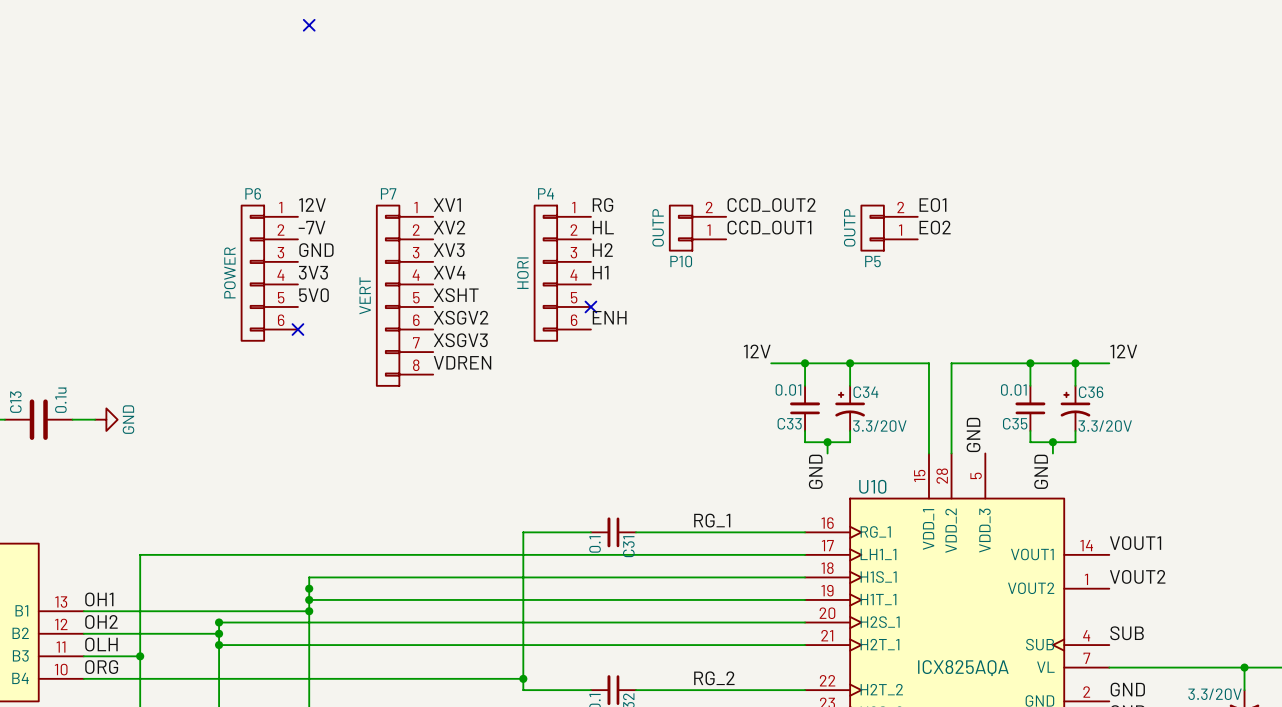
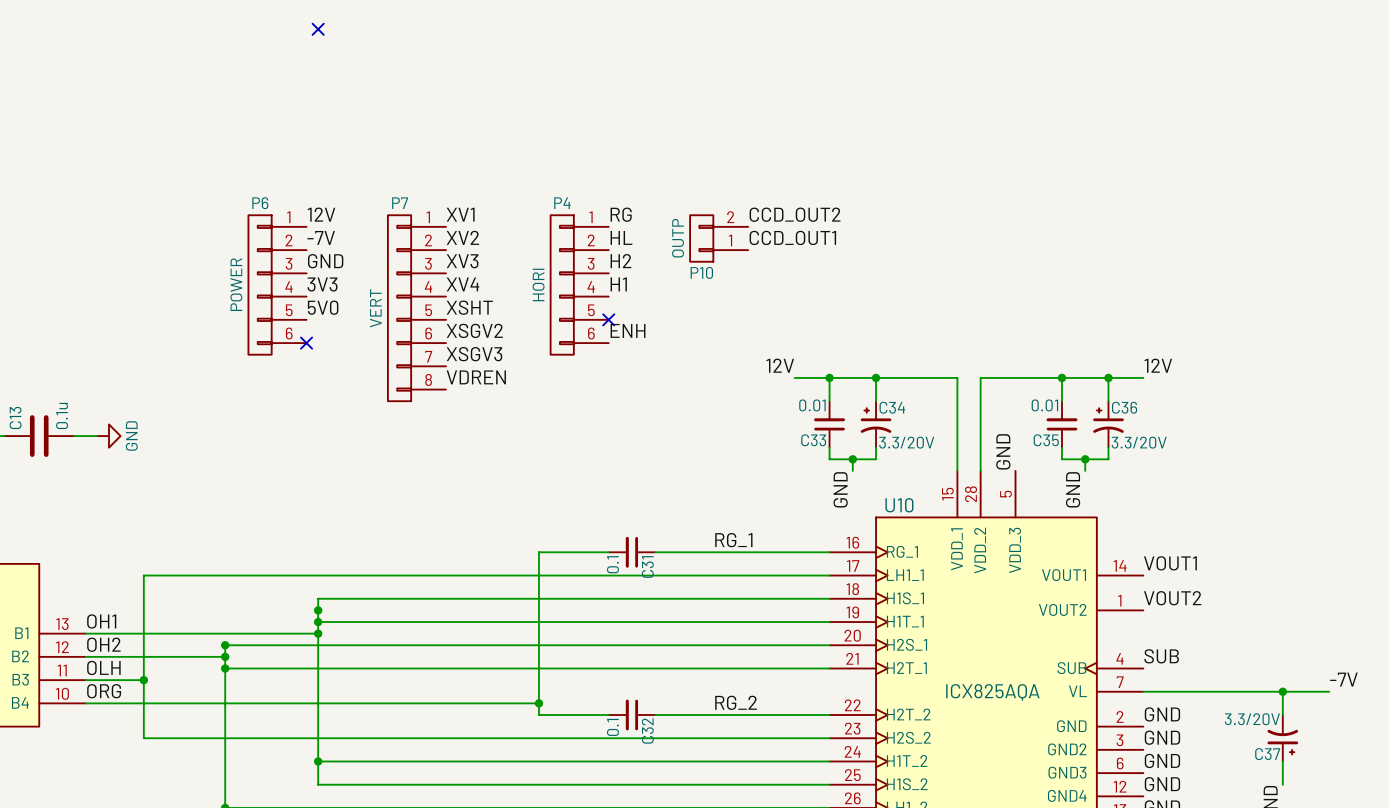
label: EO1 (932, 205) -> none
label: EO2 (935, 227) -> none
P5: OUTP (889, 228) -> none

